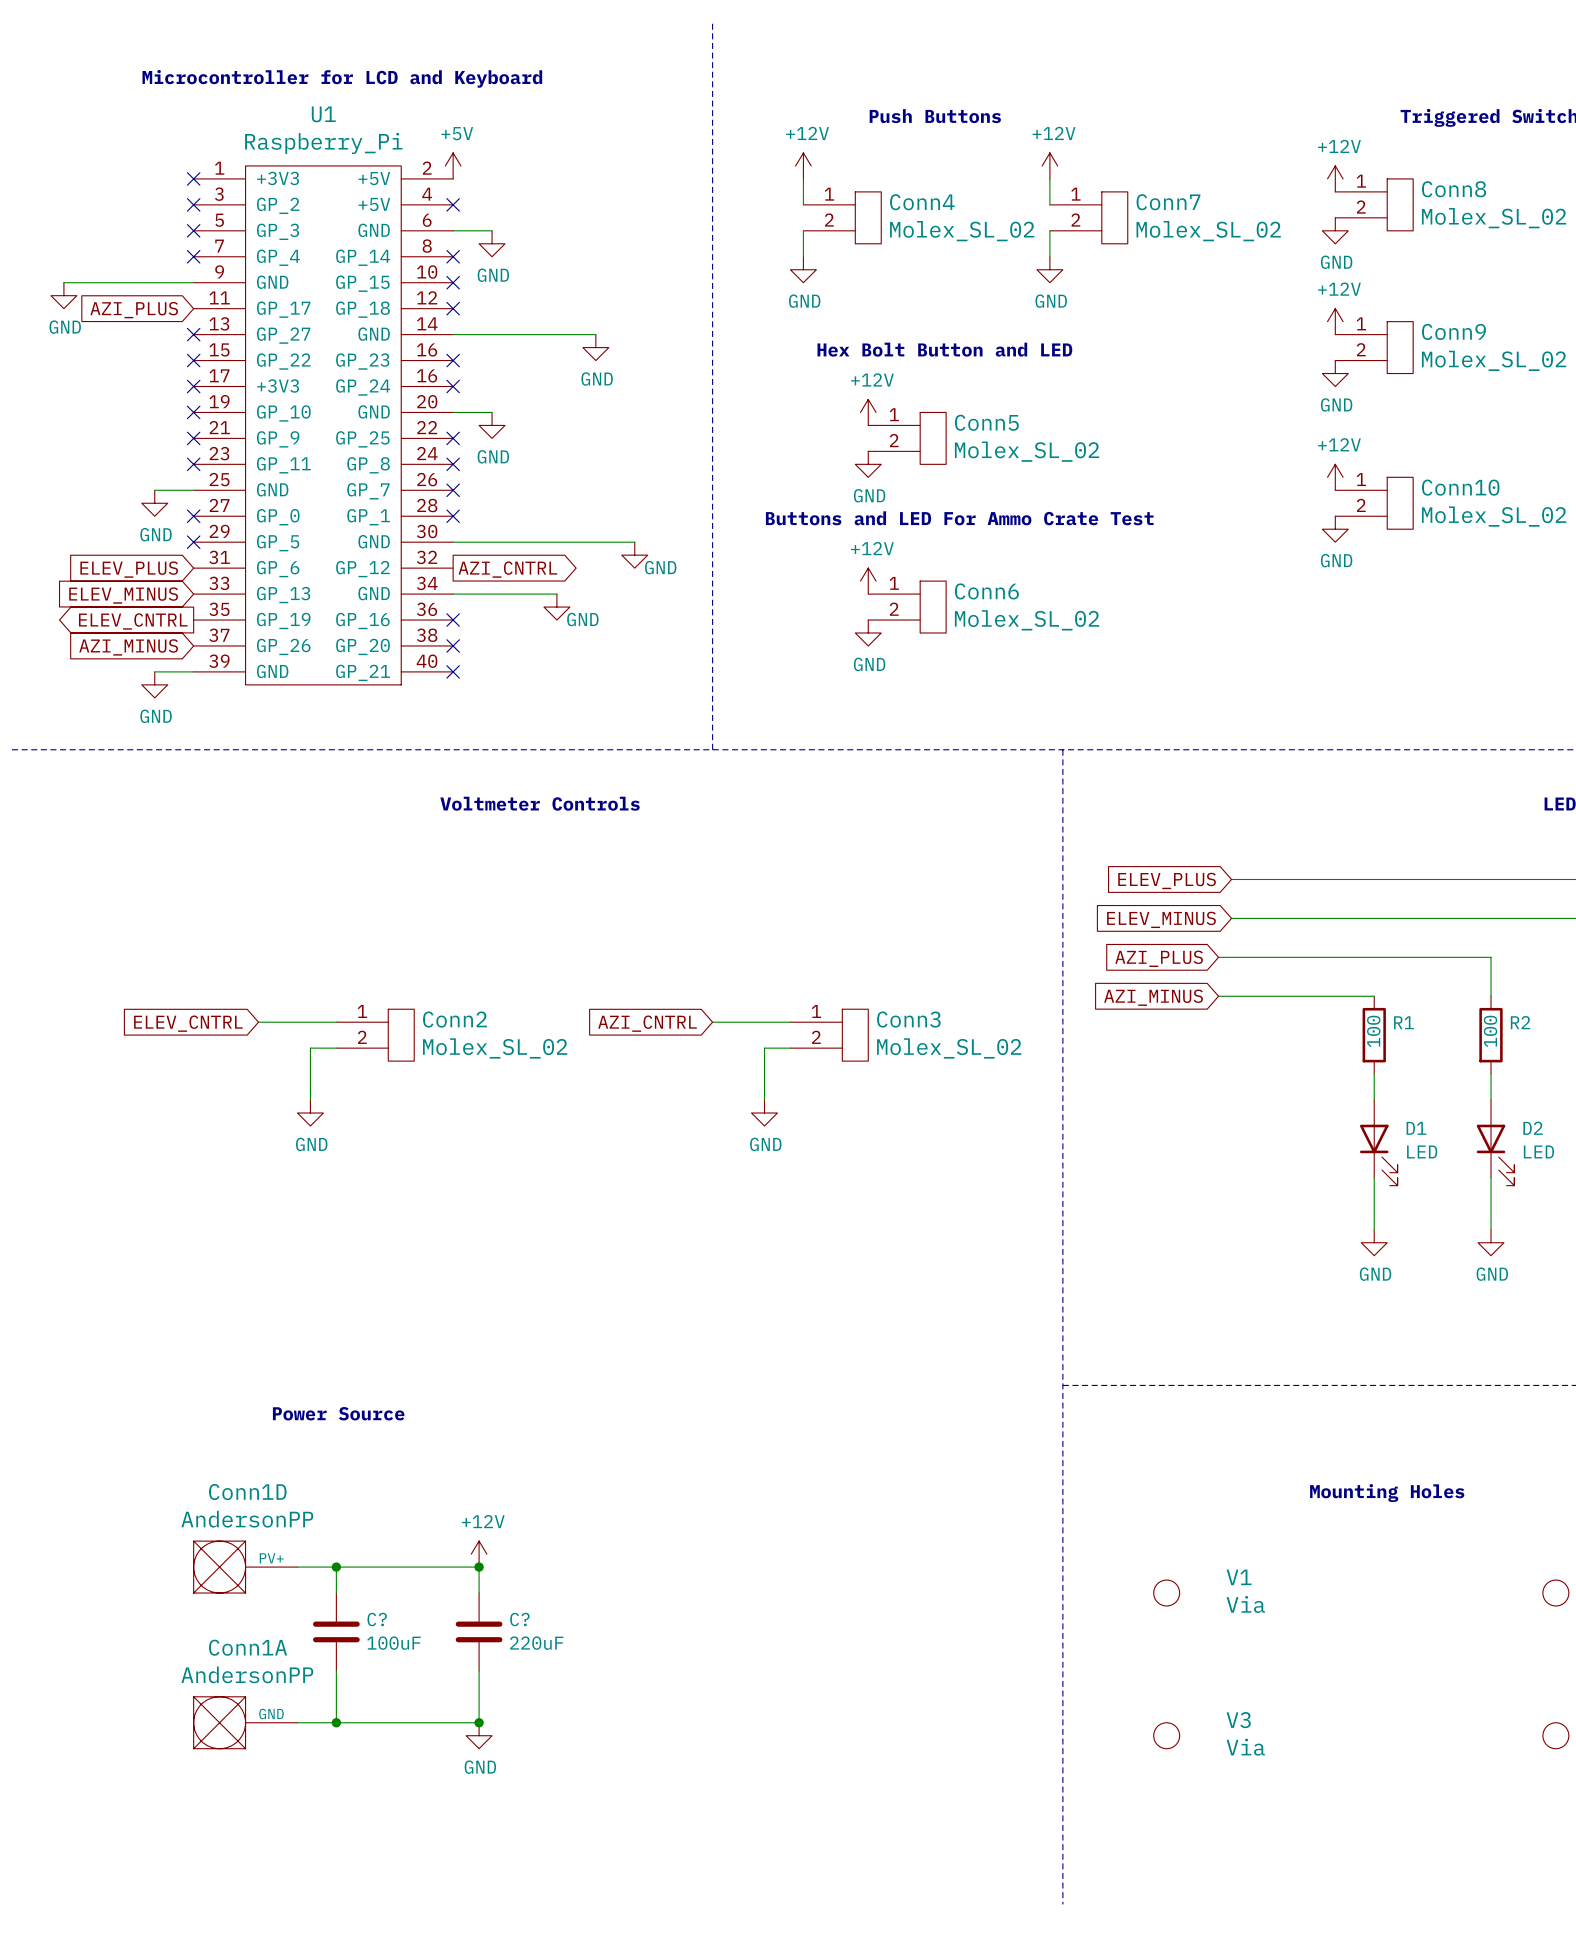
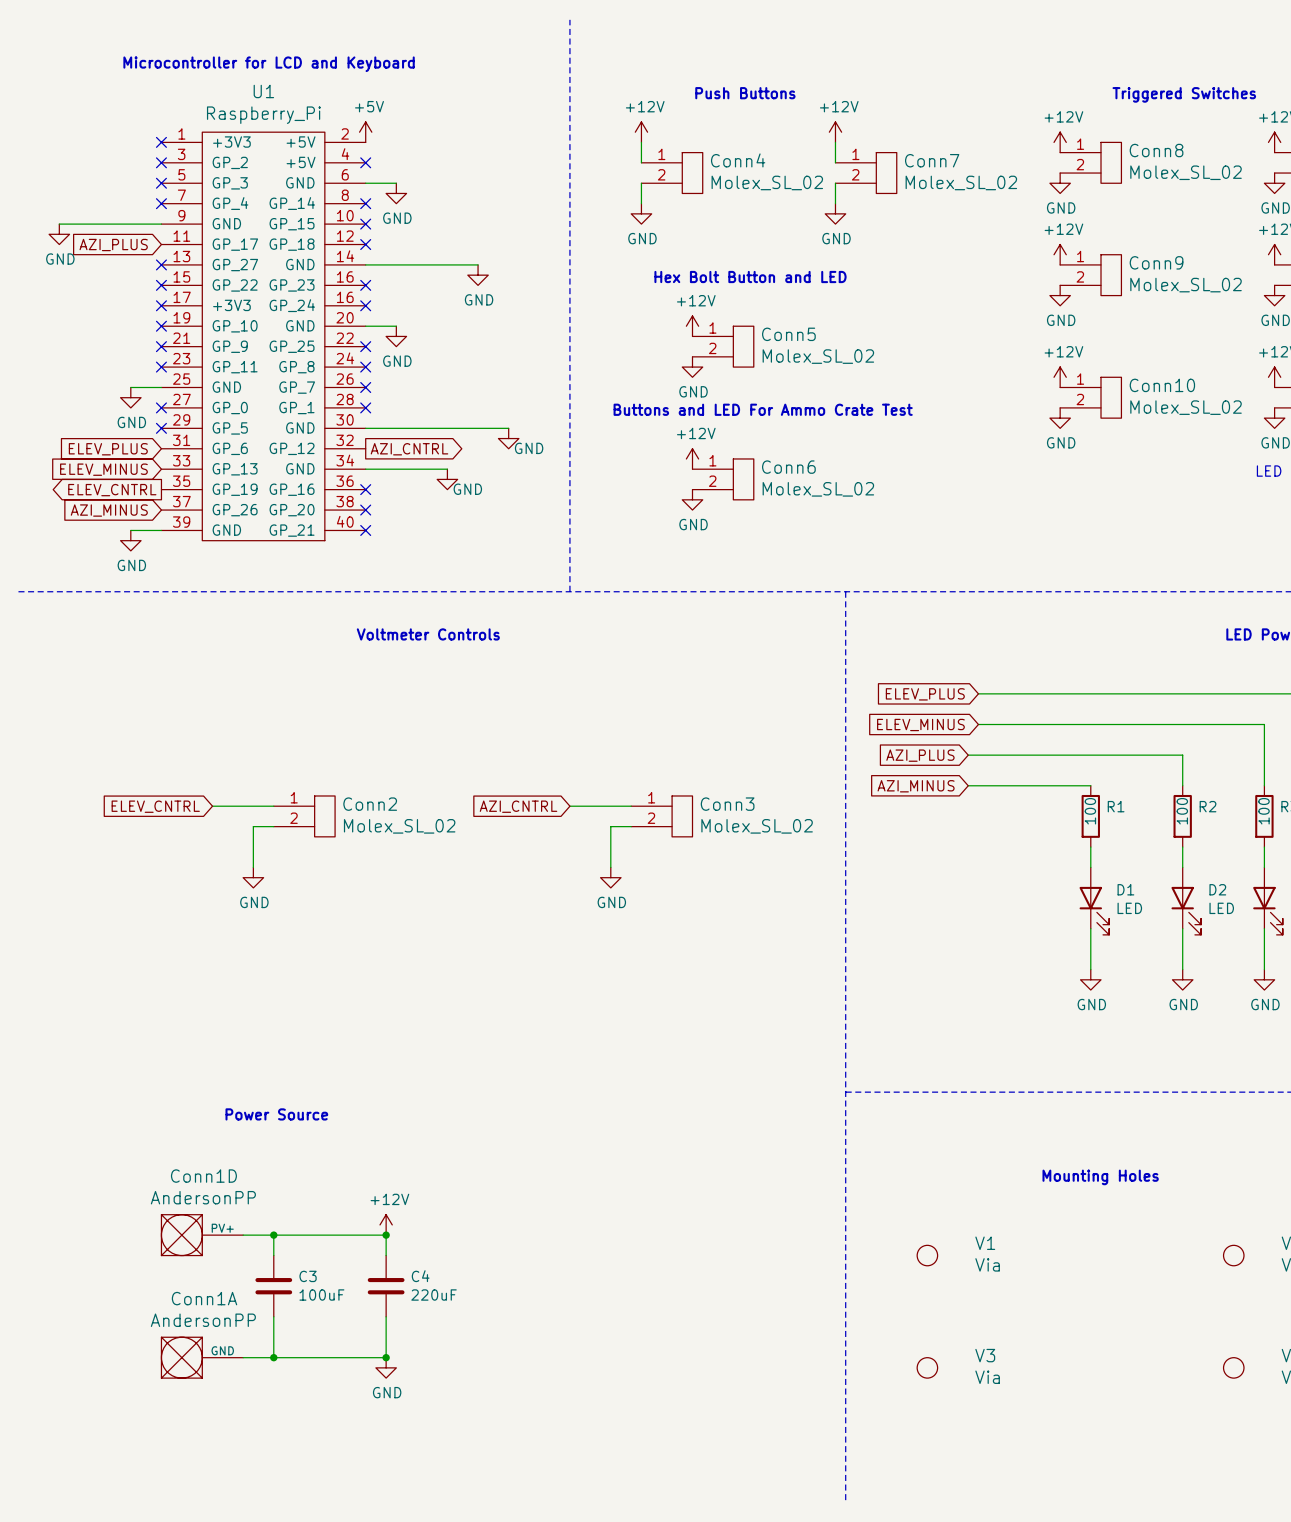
C? name: C? (377, 1619) -> C3 (308, 1276)
C? name: C? (519, 1619) -> C4 (420, 1276)

